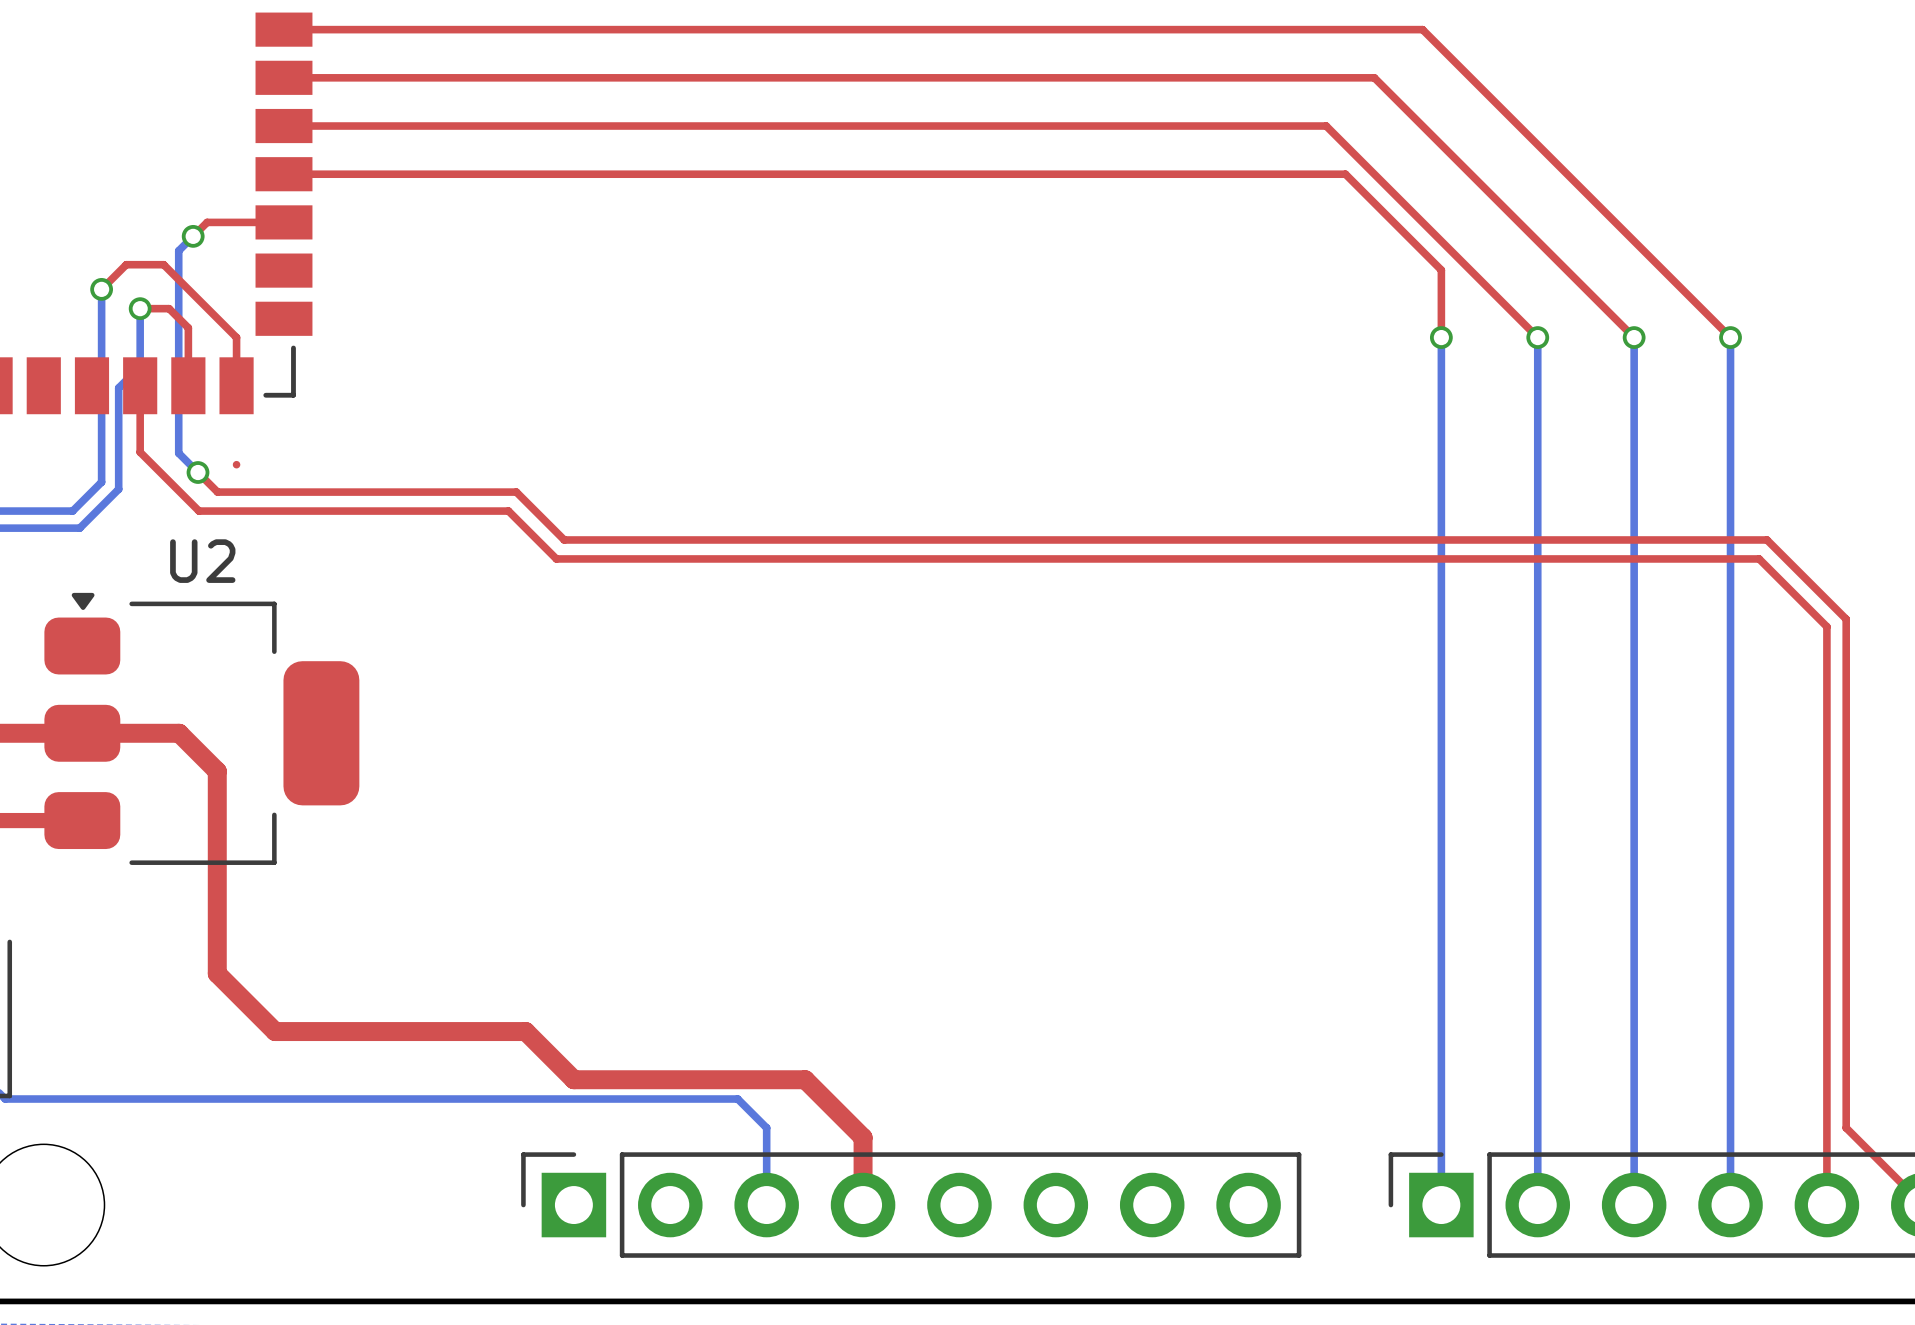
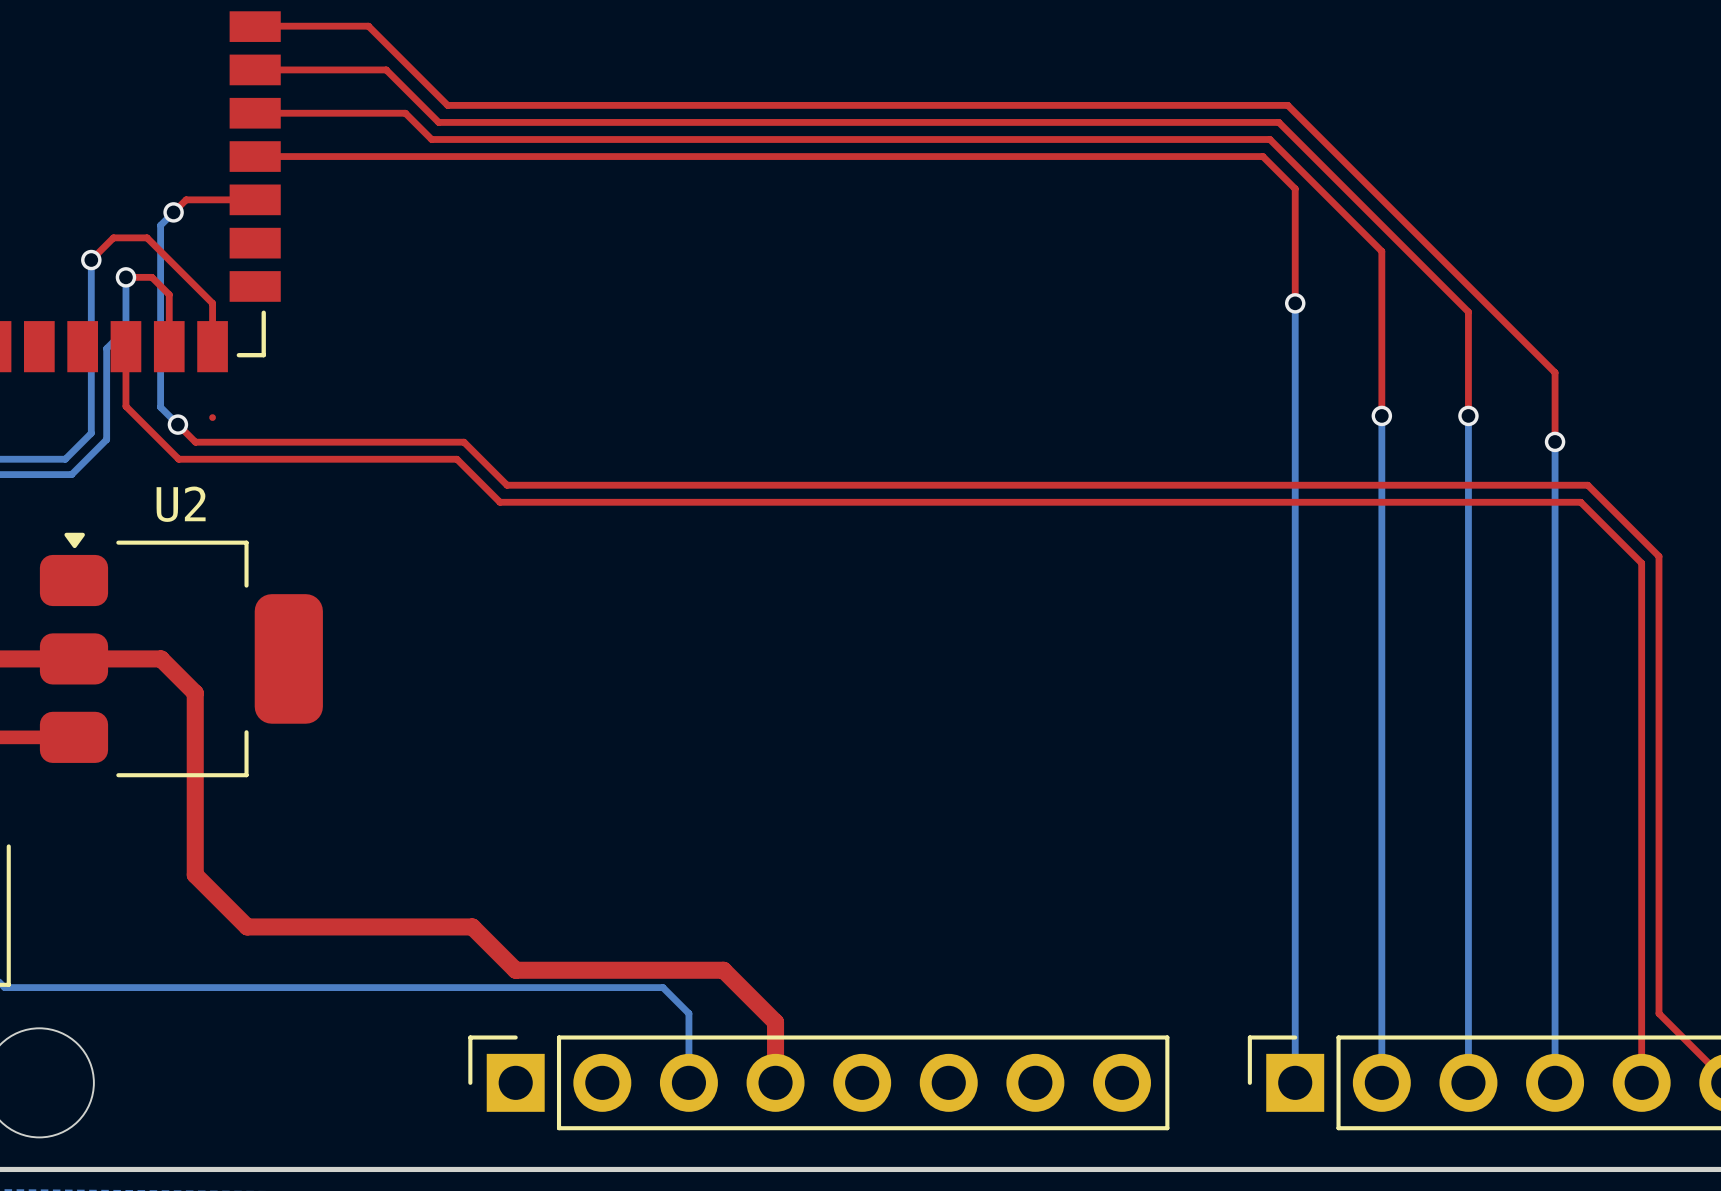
top track: (283, 29) (1422, 29) (1730, 337) -> (255, 26) (368, 26) (447, 105) (1287, 105) (1555, 372) (1555, 441)
top track: (429, 77) (1374, 77) (1634, 337) -> (386, 69) (438, 122) (1278, 122) (1468, 312) (1468, 415)
top track: (451, 126) (1326, 126) (1537, 337) -> (405, 113) (431, 139) (1269, 139) (1381, 251) (1381, 415)
top track: (1345, 174) (1441, 270) -> (1209, 156) (1262, 156) (1295, 188) (1295, 242)
bottom track: (1537, 337) (1537, 462) -> none
via: (1537, 337) -> none
bottom track: (1634, 337) (1634, 462) -> none
via: (1634, 337) -> none
bottom track: (1730, 337) (1730, 491) -> none
via: (1730, 337) -> none
via: none -> (1381, 415)
via: none -> (1468, 415)
via: none -> (1555, 441)

